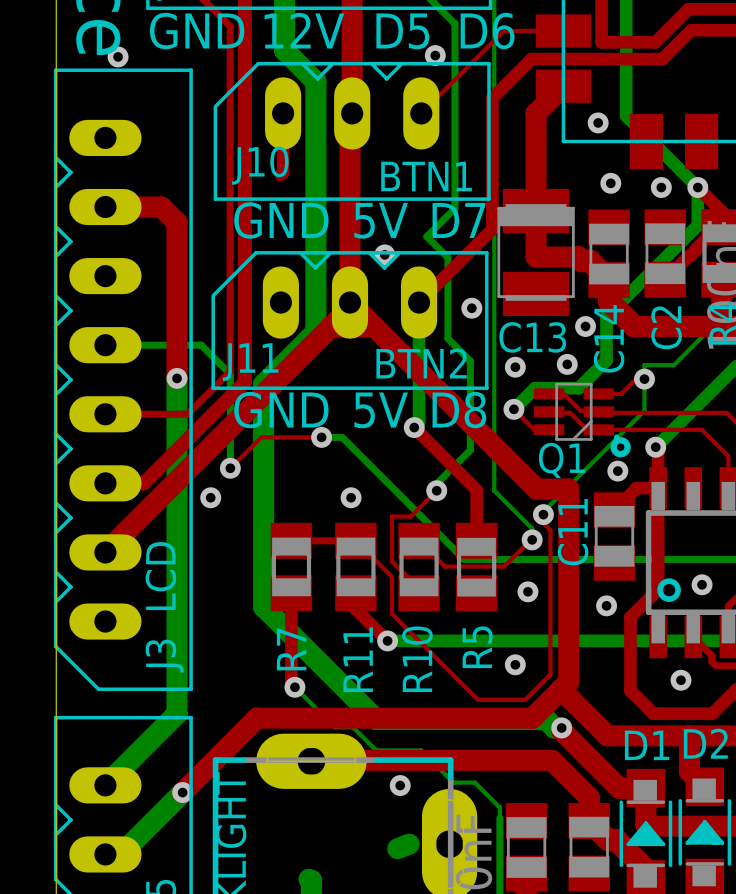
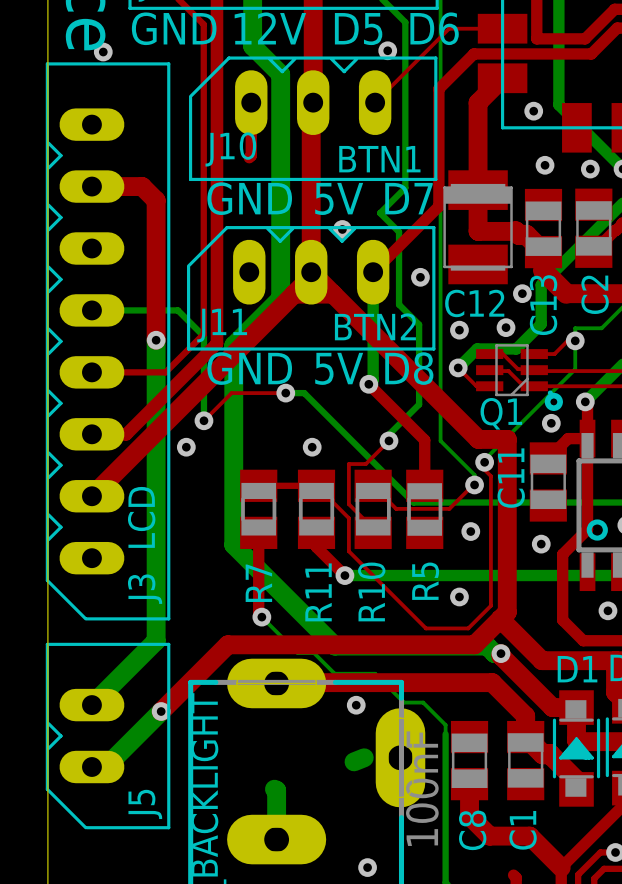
C13 name: C13 (532, 337) -> C12 (474, 303)
C14 name: C14 (609, 338) -> C13 (543, 305)

